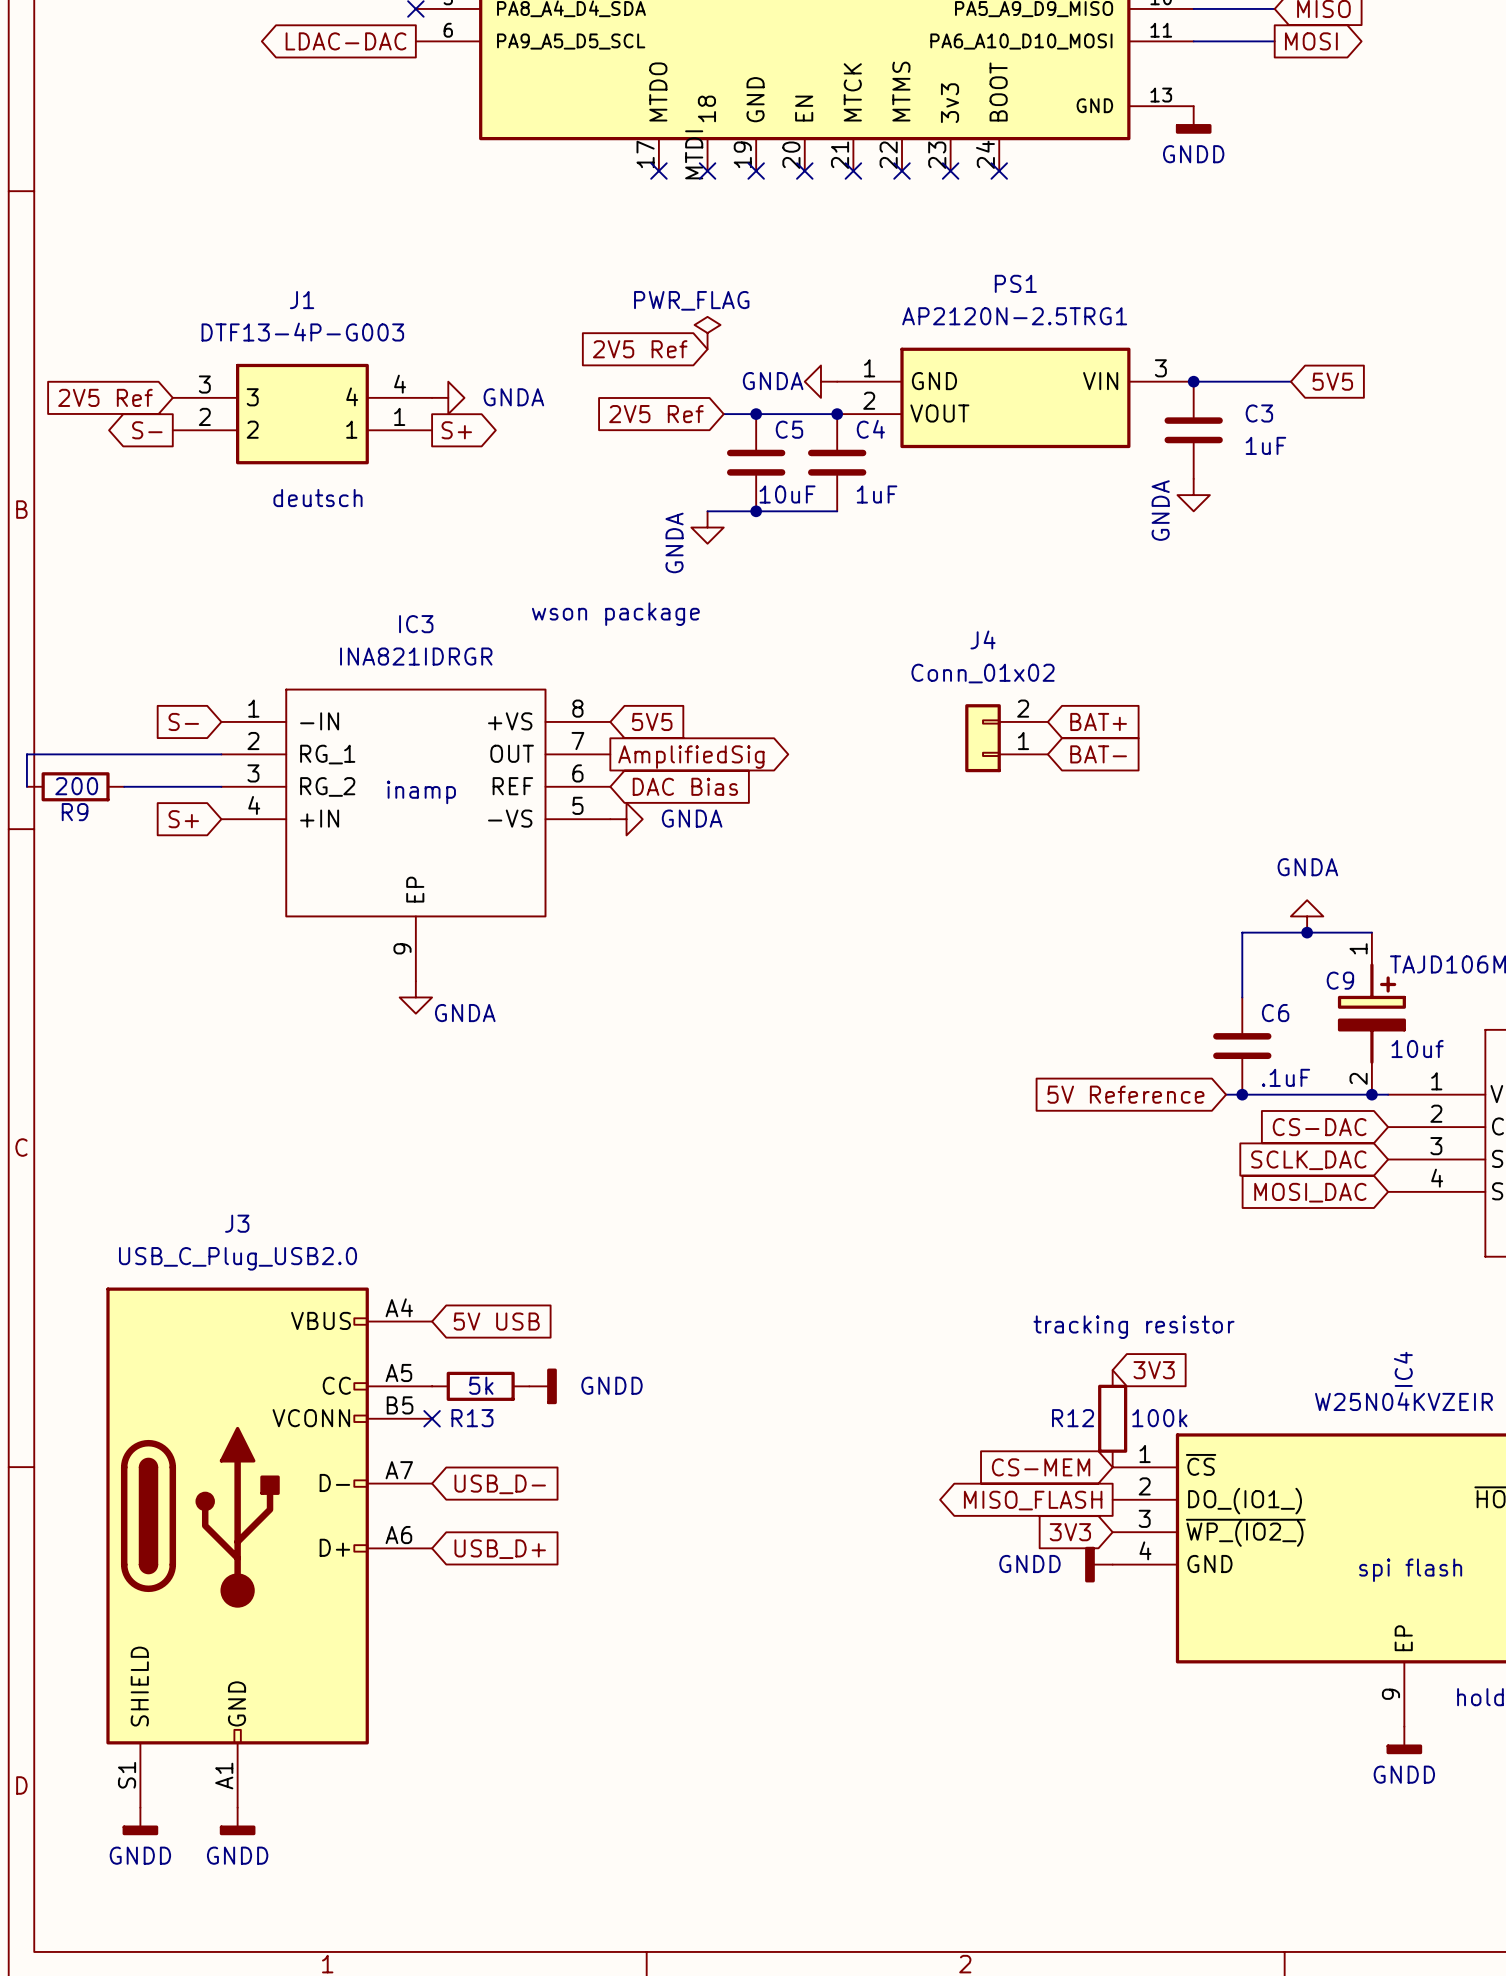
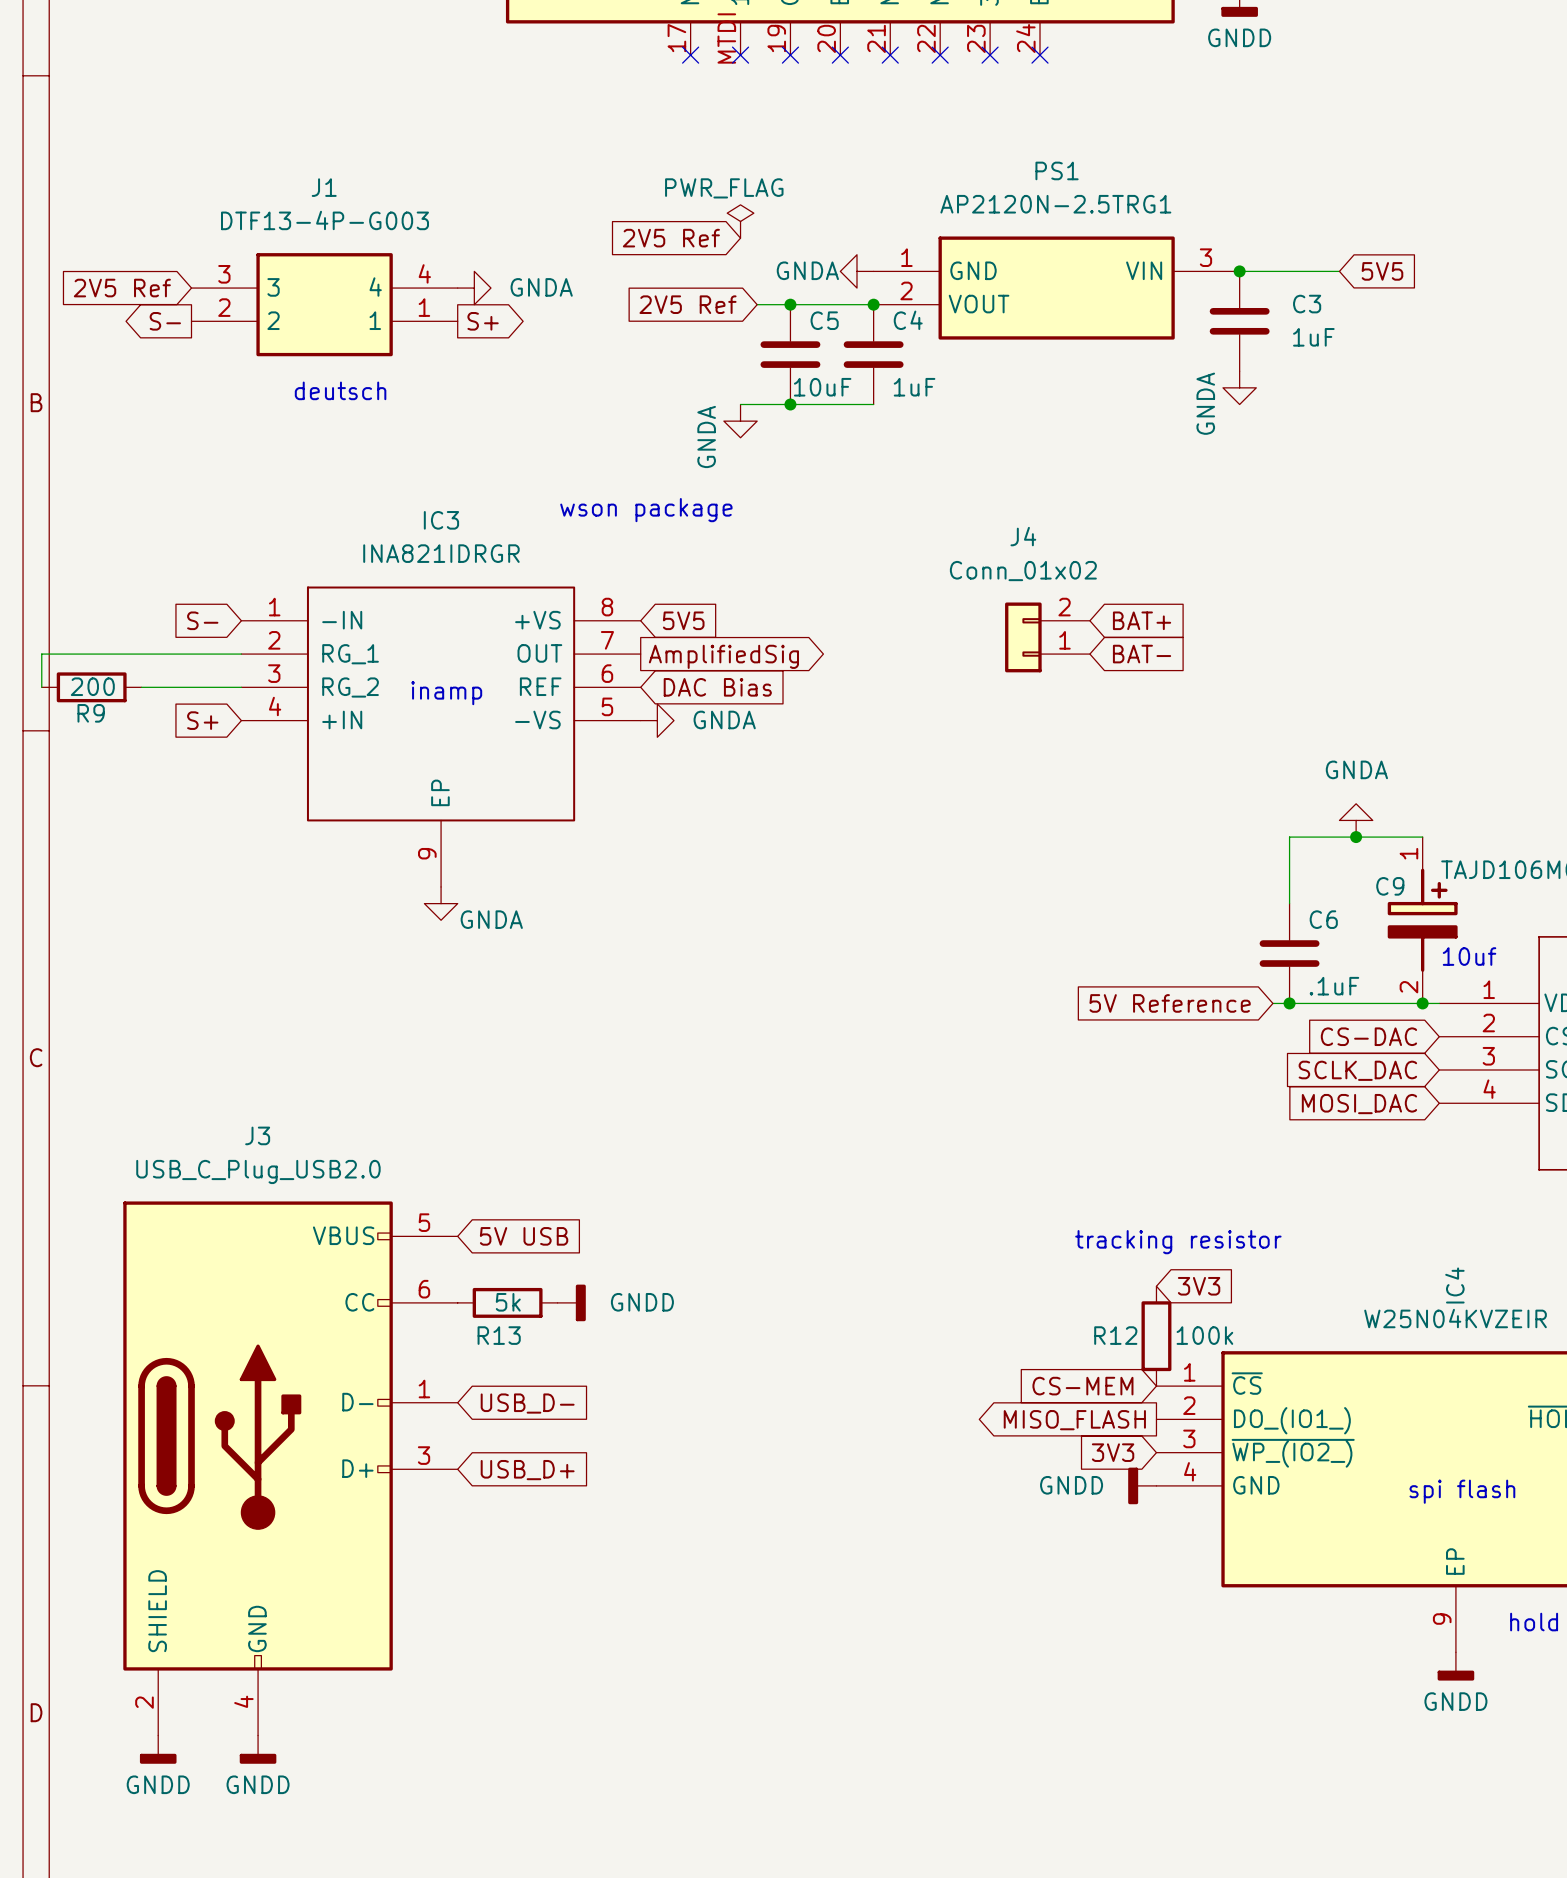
J3 symbol: [106, 1287, 433, 1808] -> [123, 1201, 458, 1736]
no-connect mark: (432, 1418) -> none

